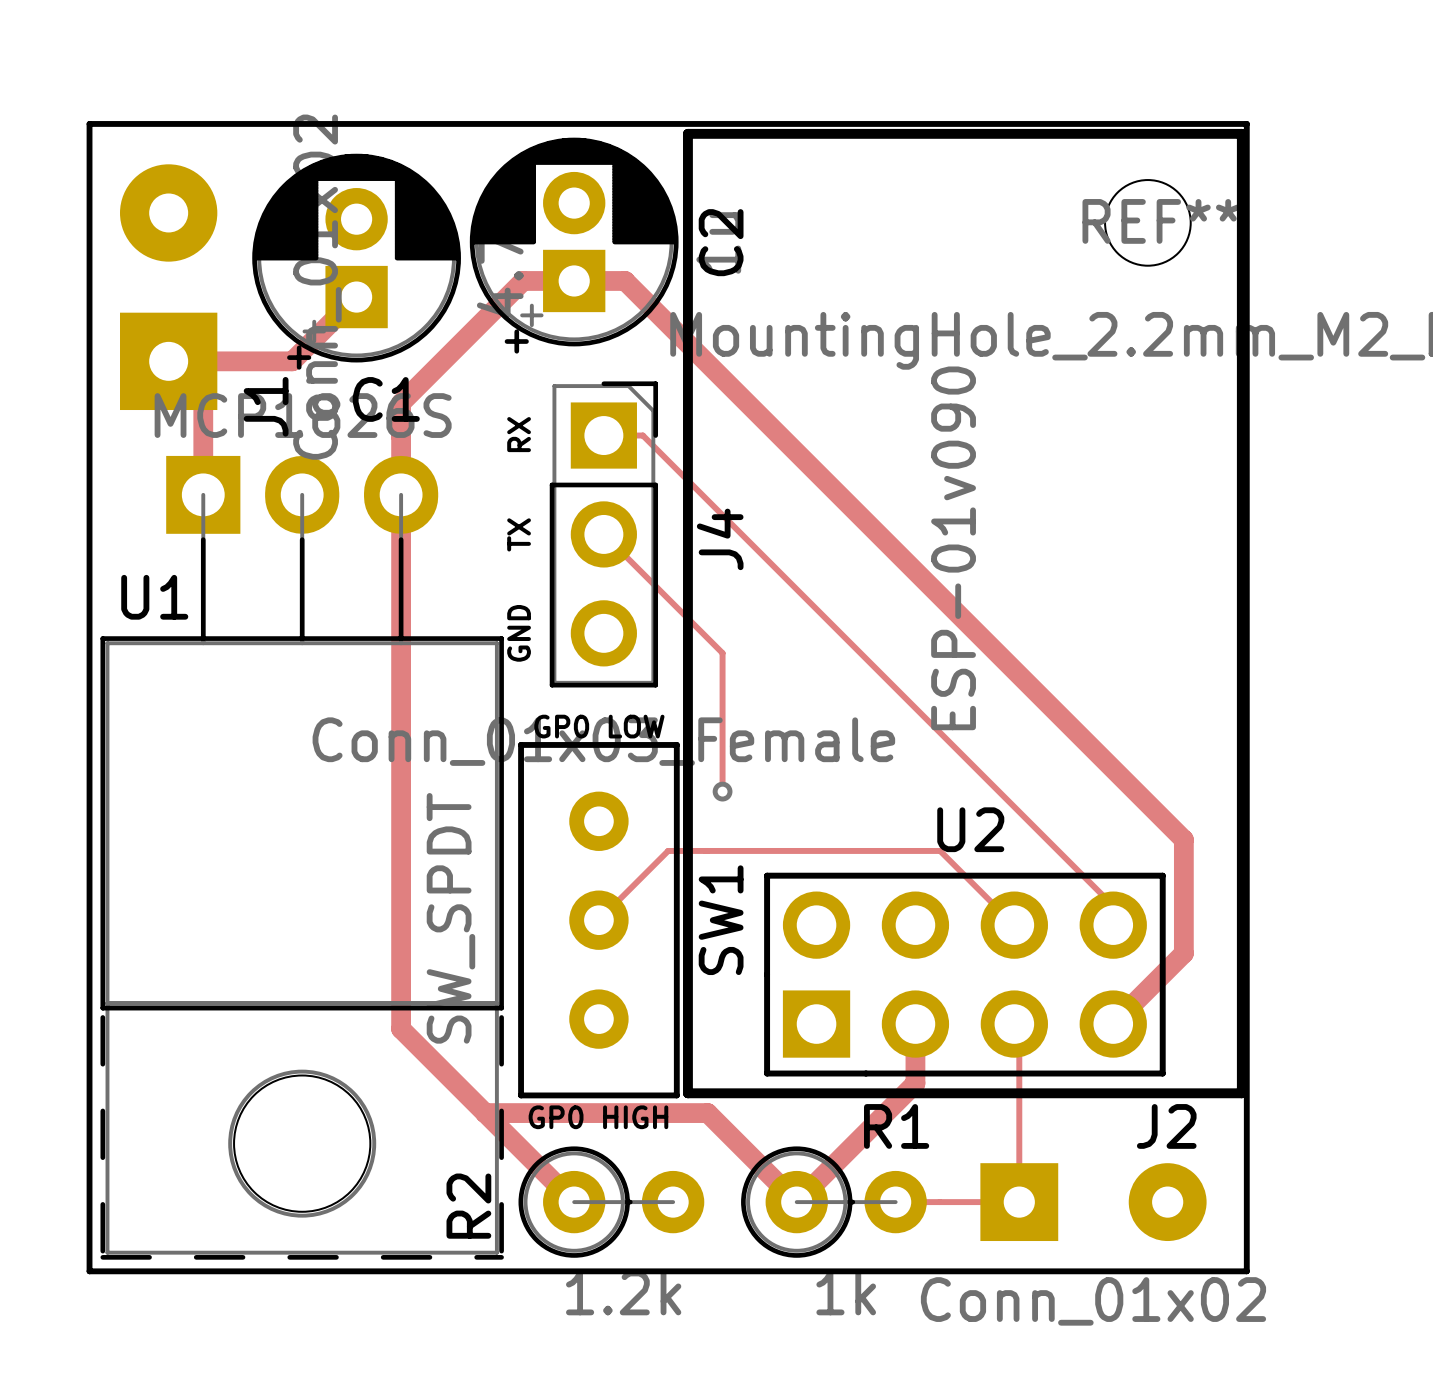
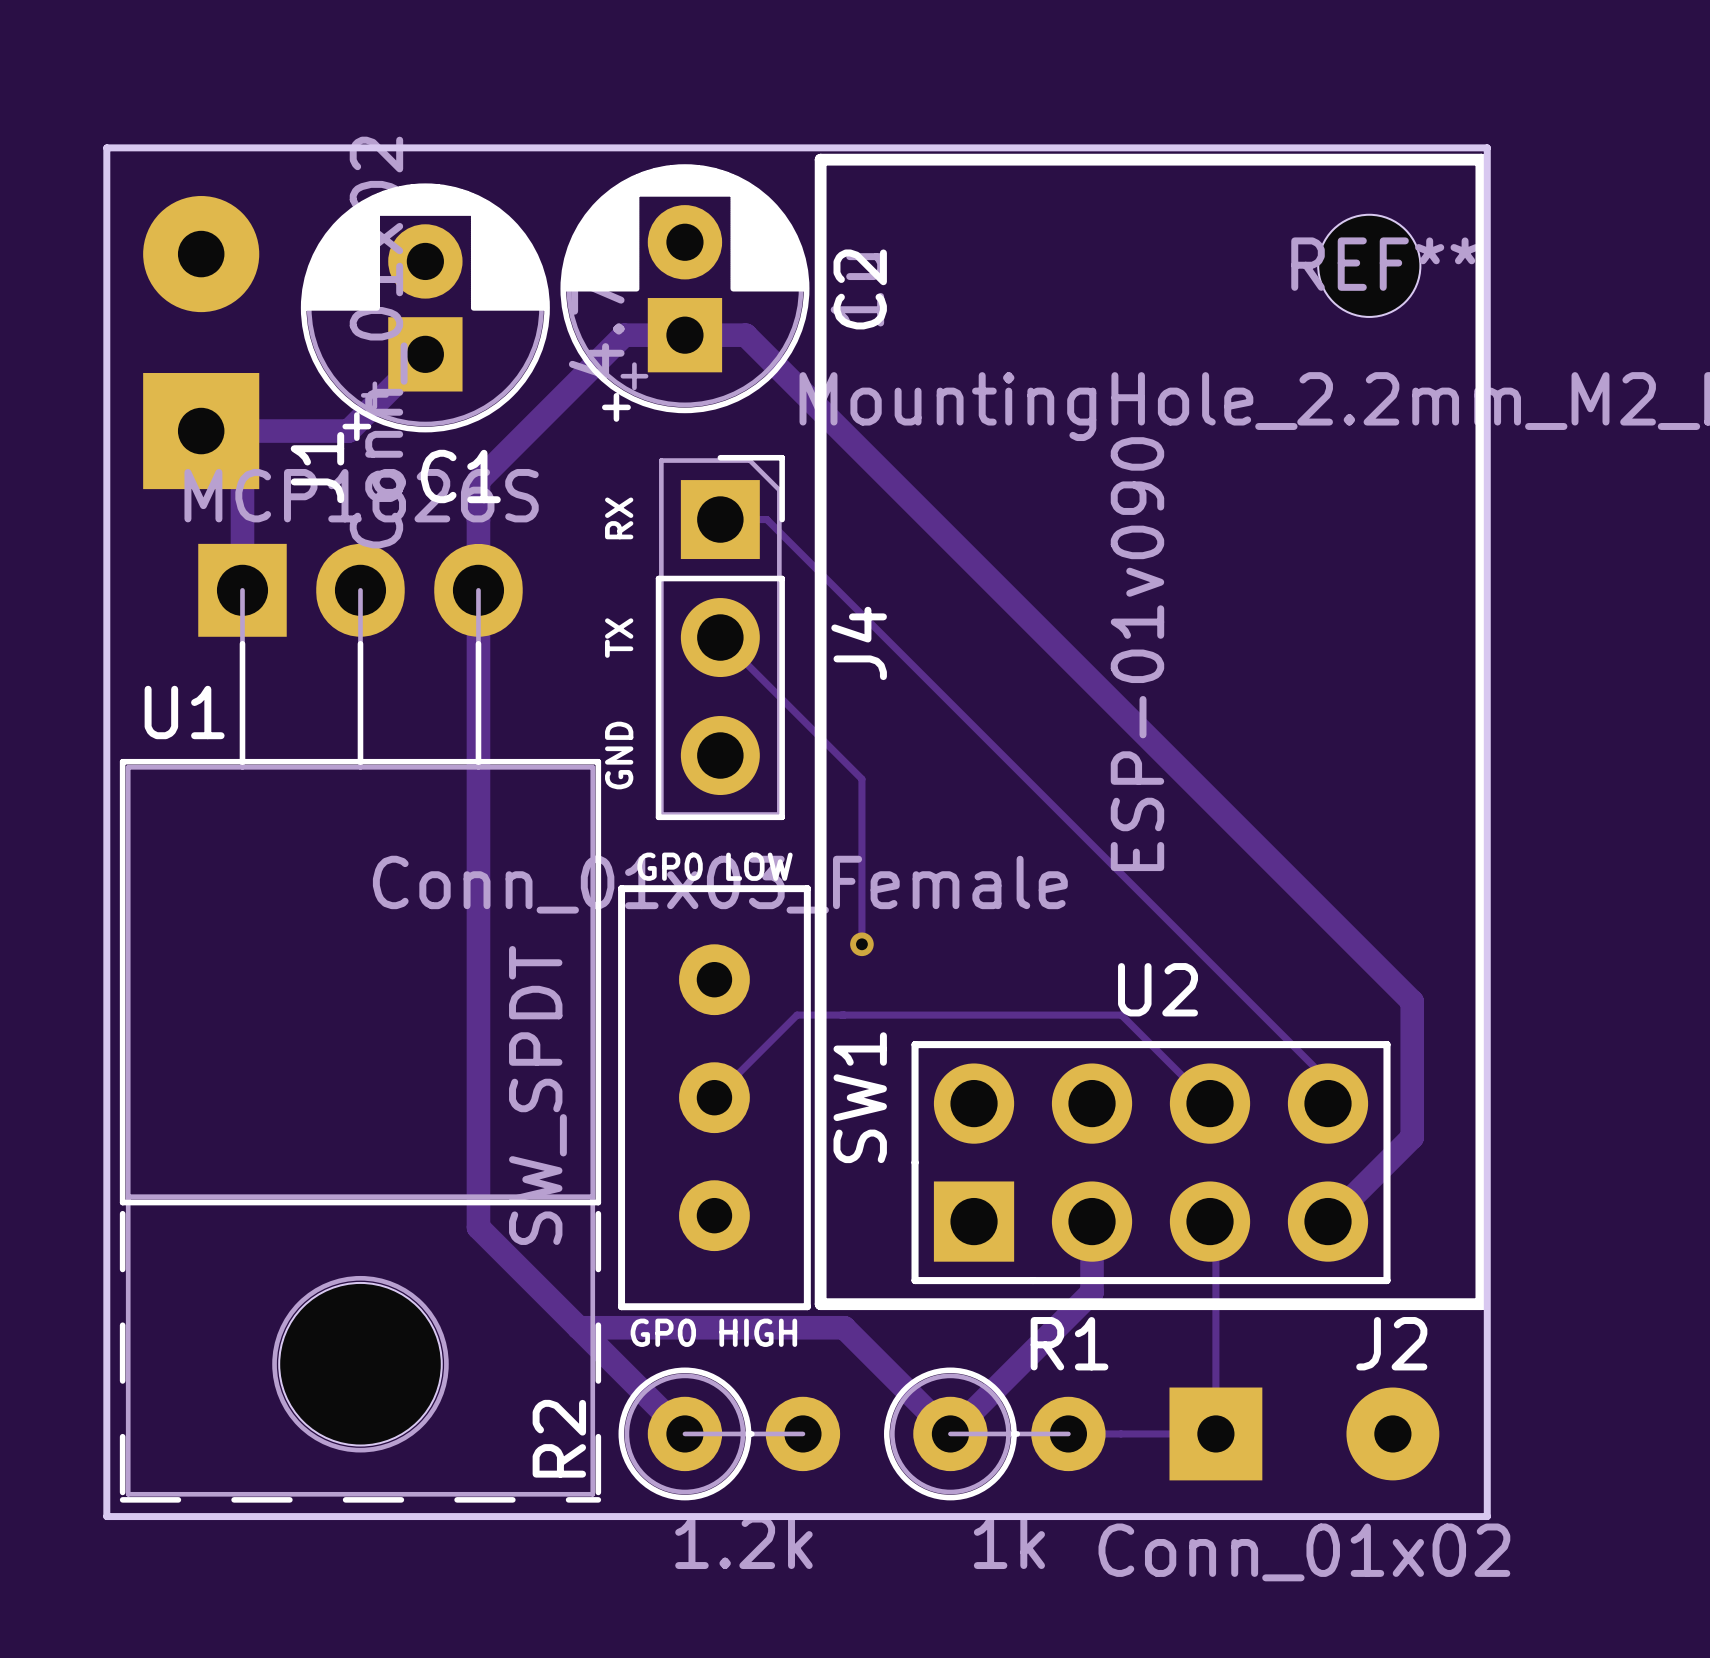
J1 name position: J1 (266, 406) -> J1 (317, 467)

